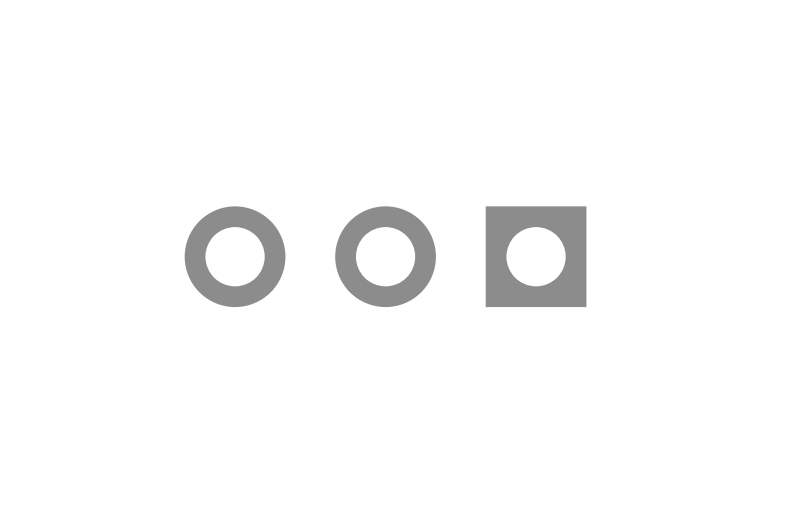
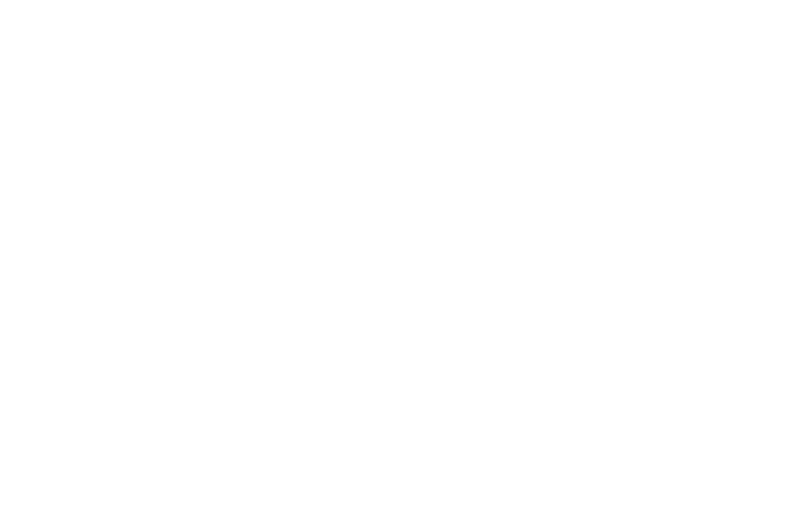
part: (385, 256) -> none

